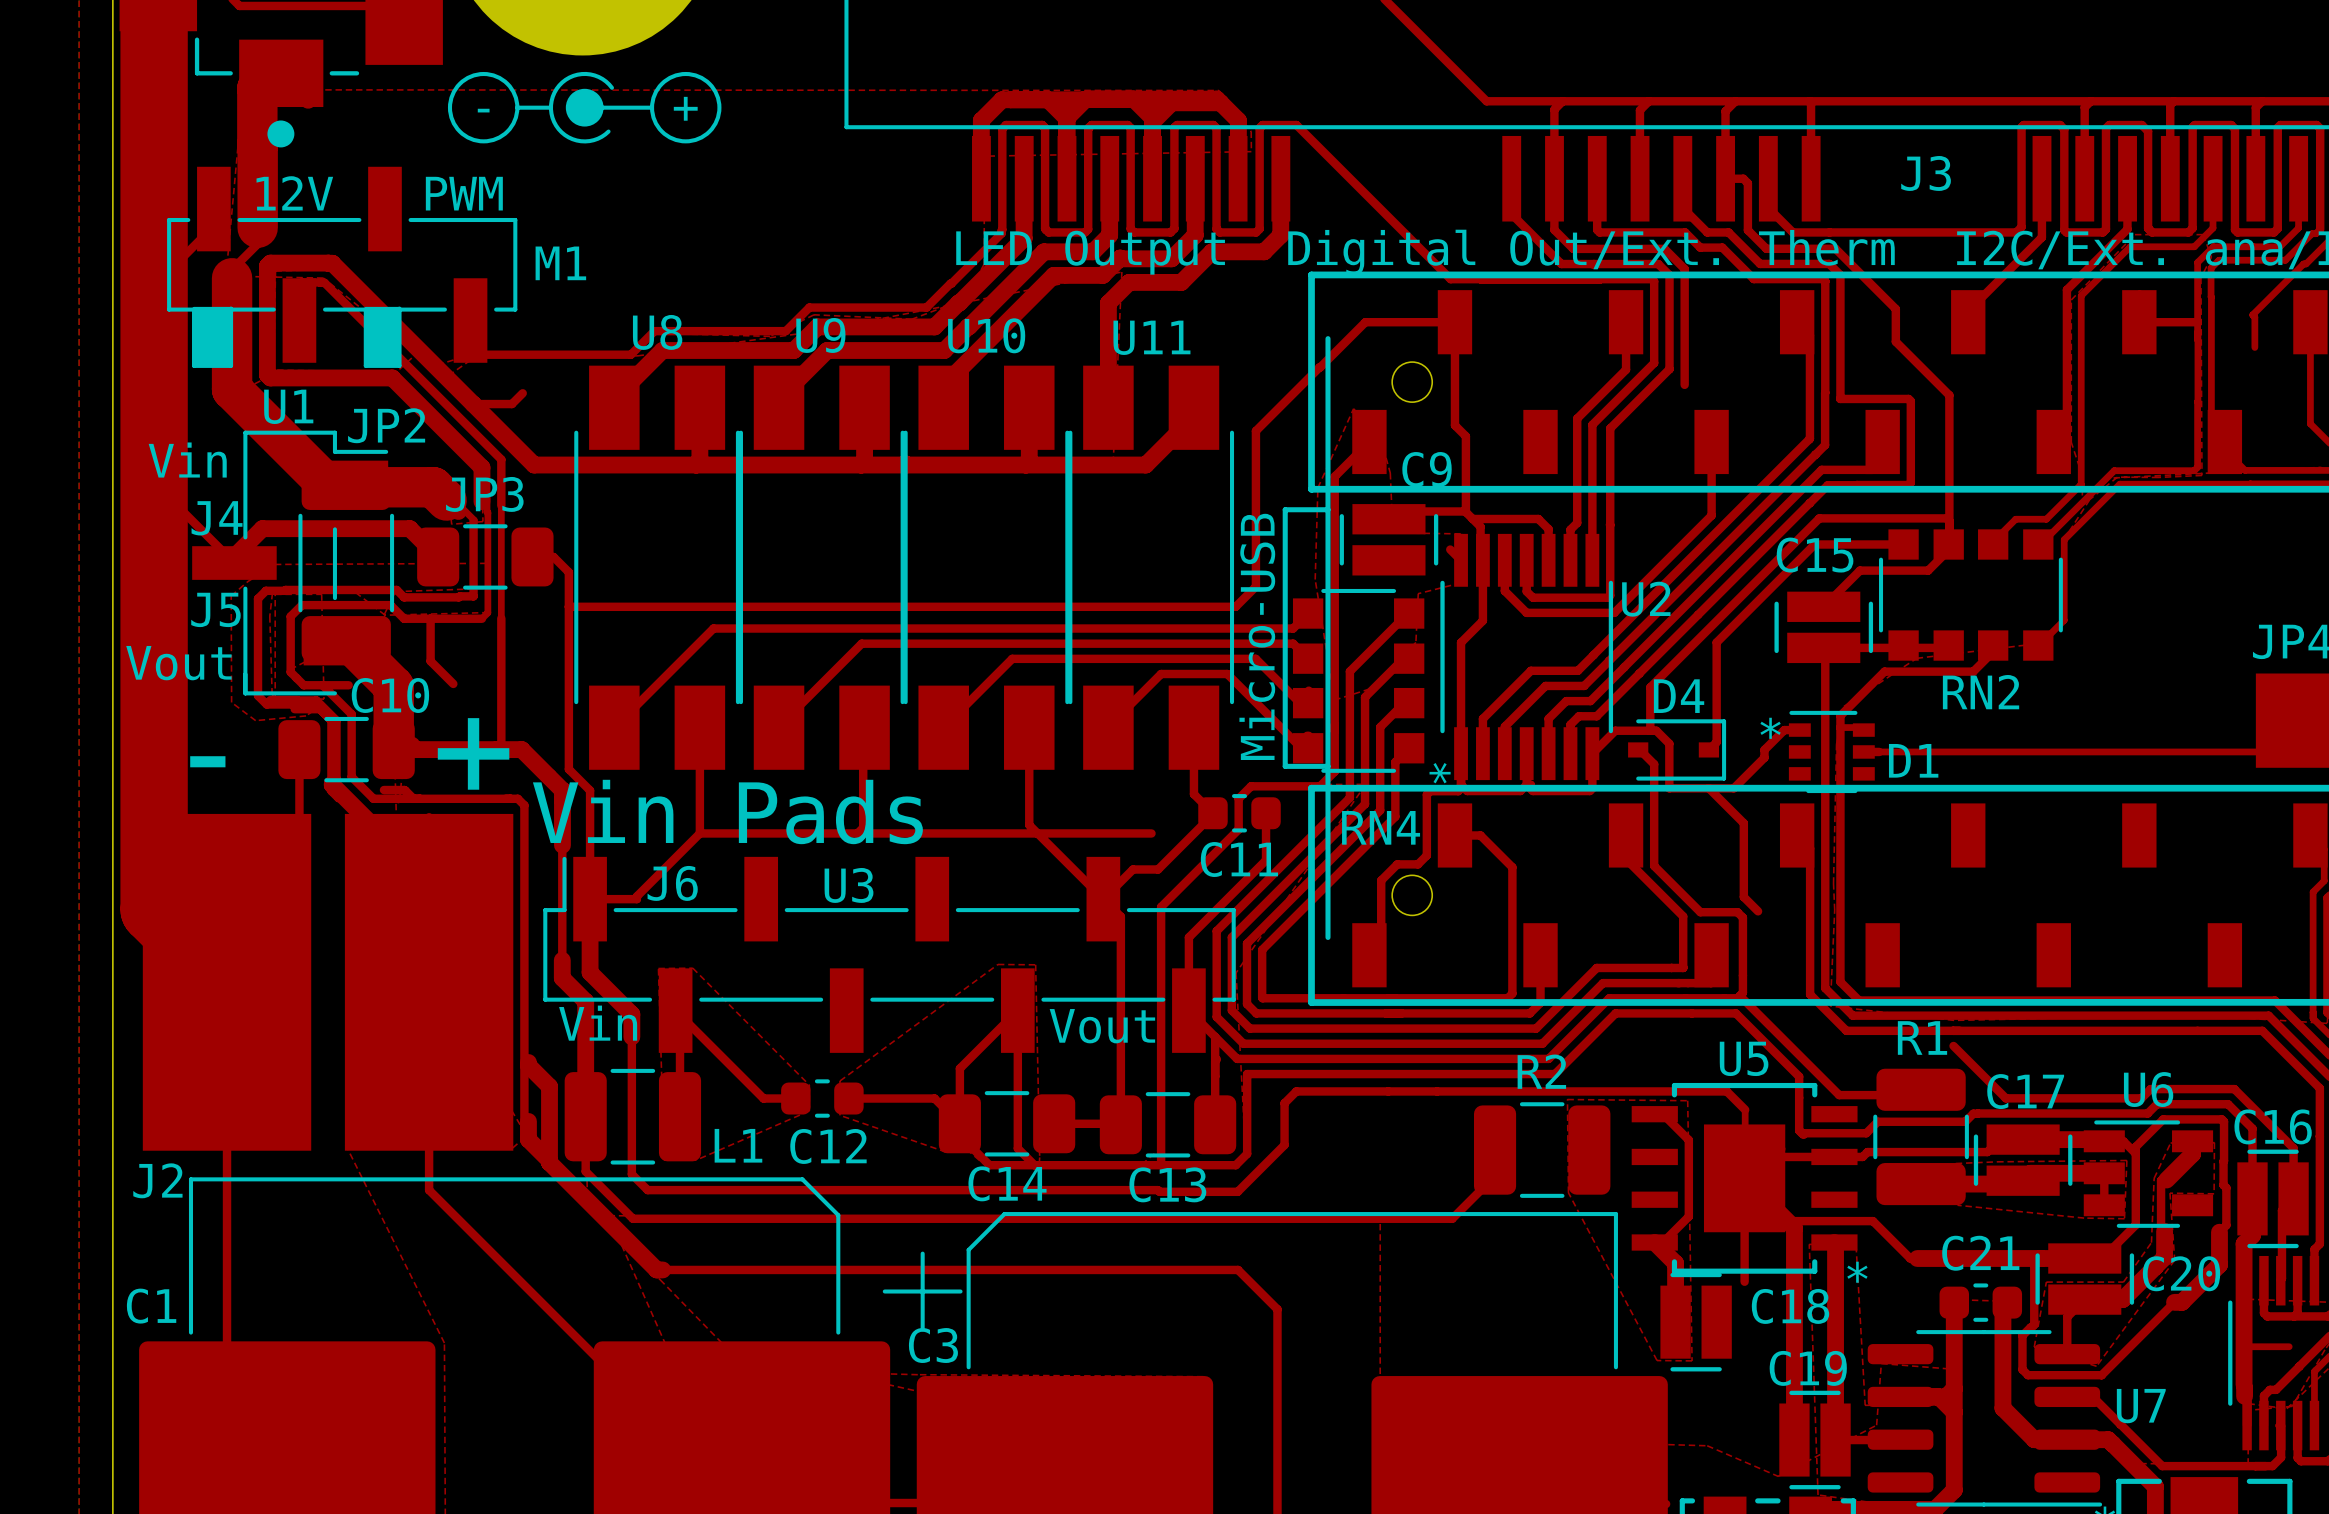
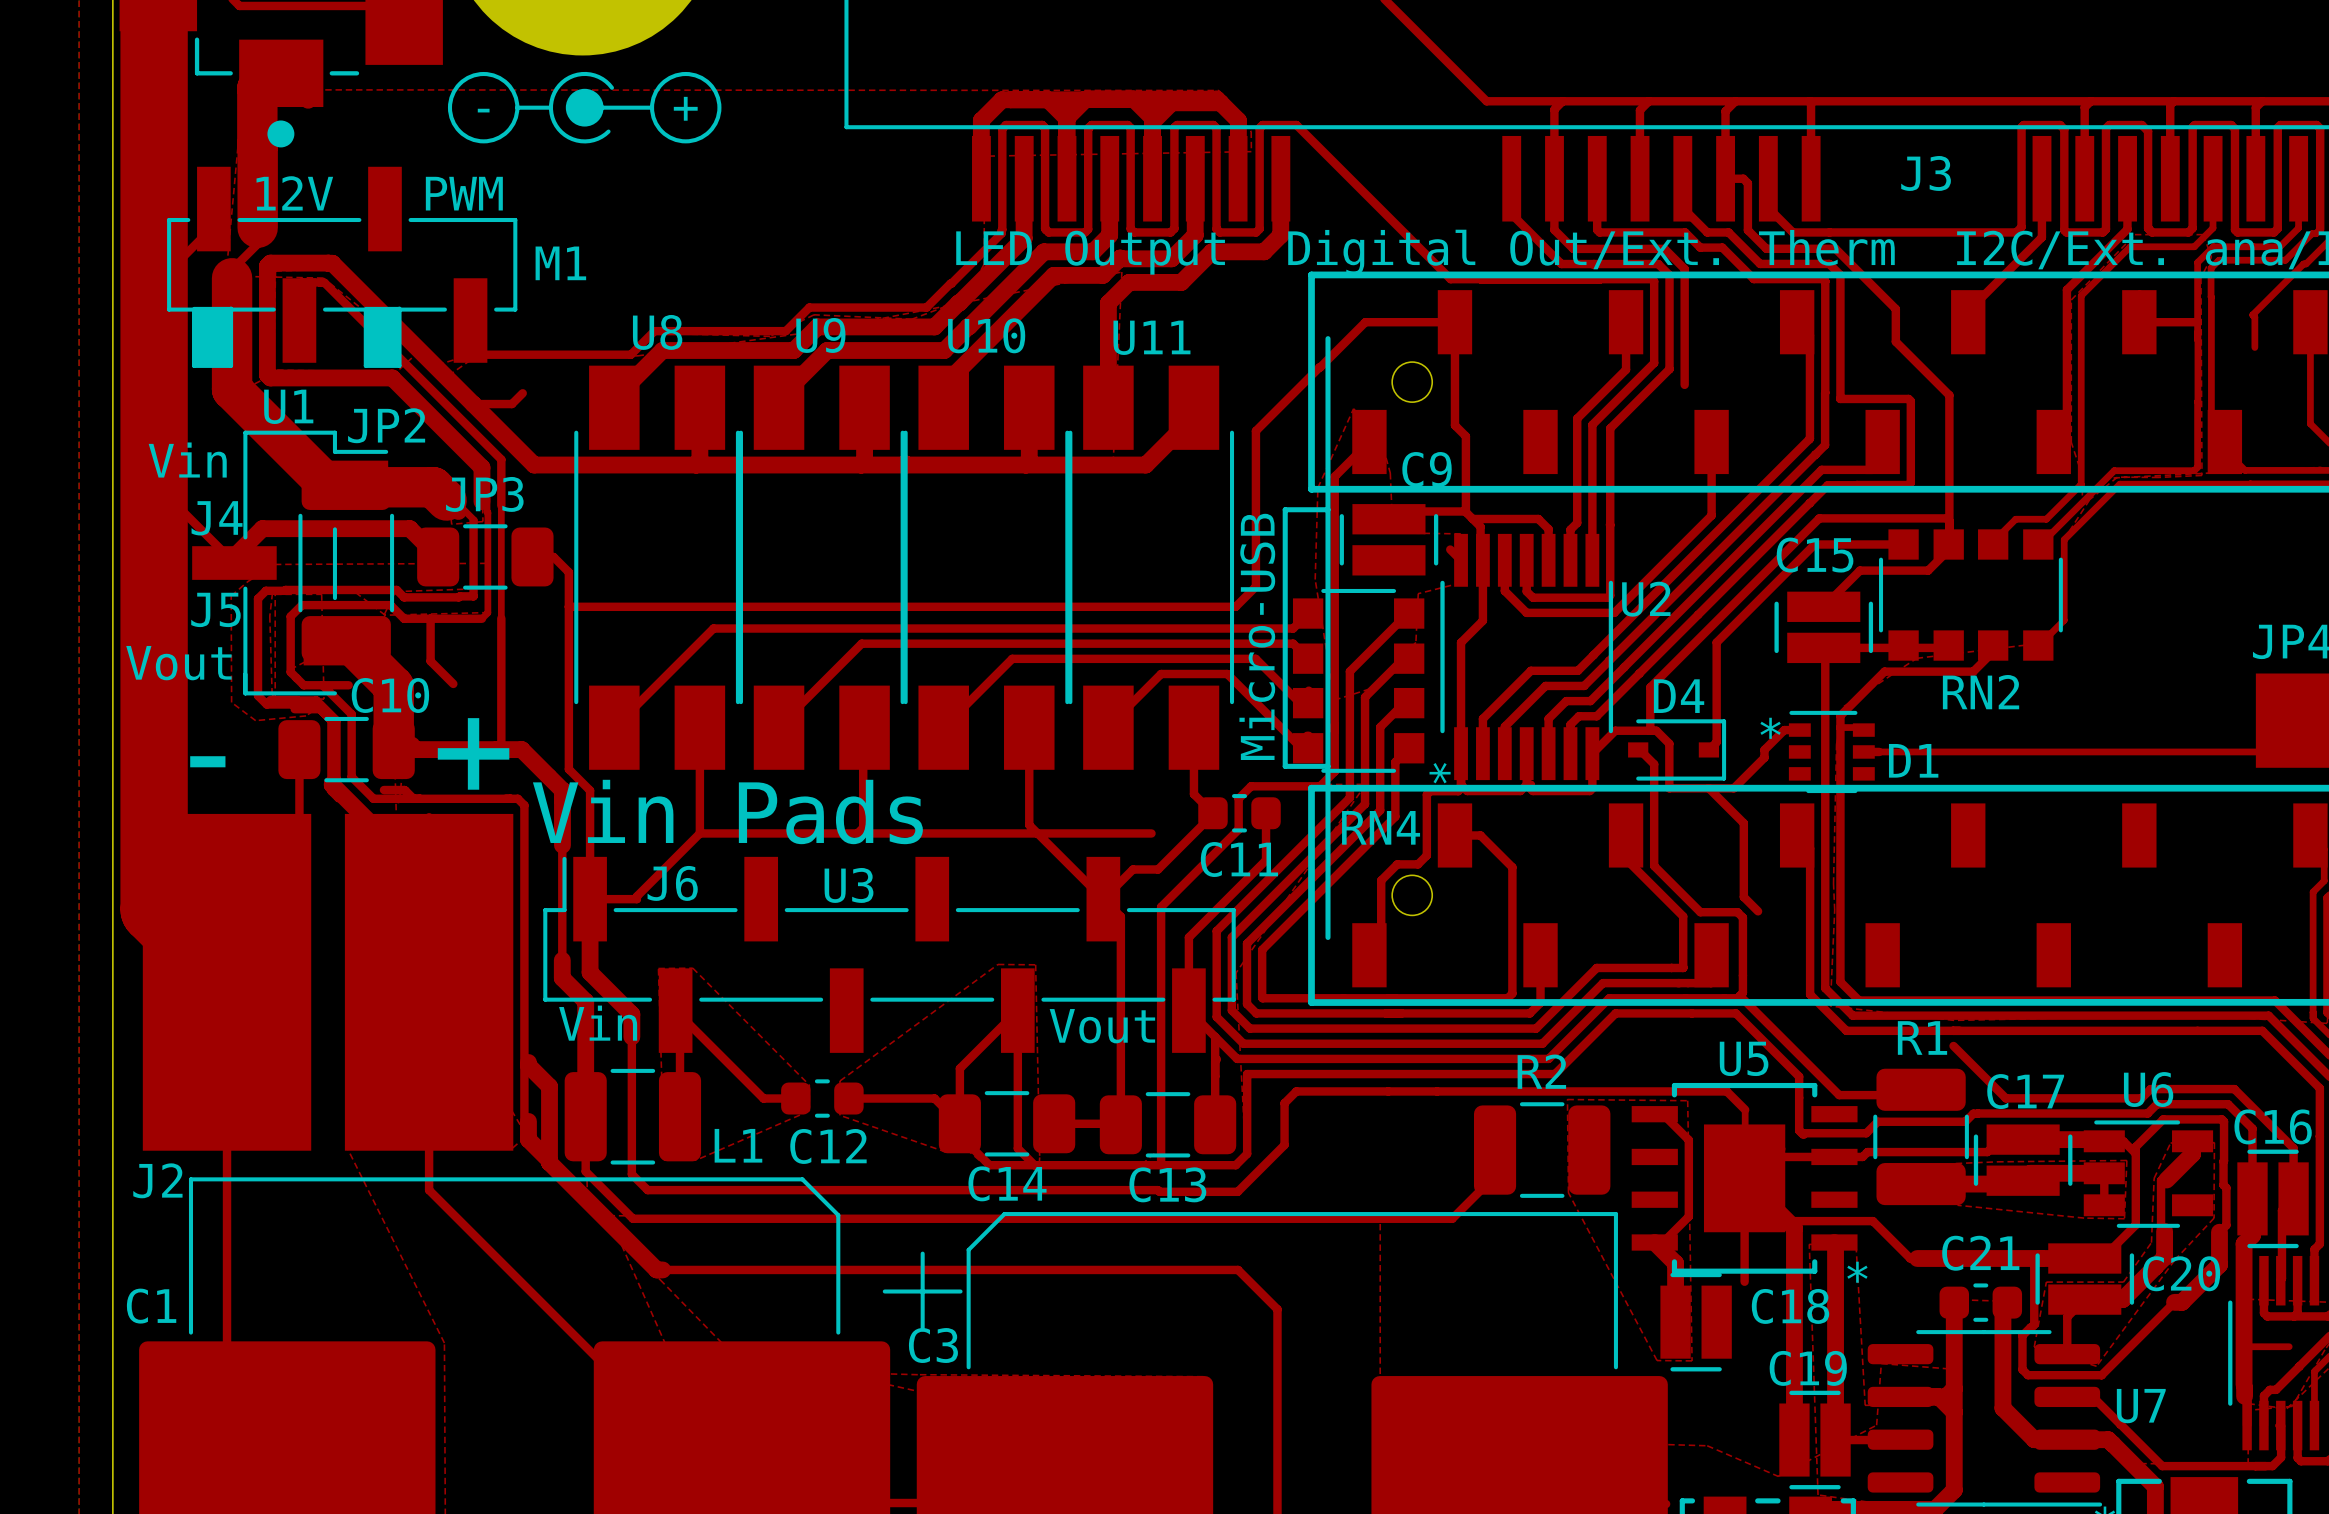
top zone outline: (2214, 1193) (2169, 1193) (2174, 1260) -> (2214, 1193) (2214, 1218) (2174, 1260)

